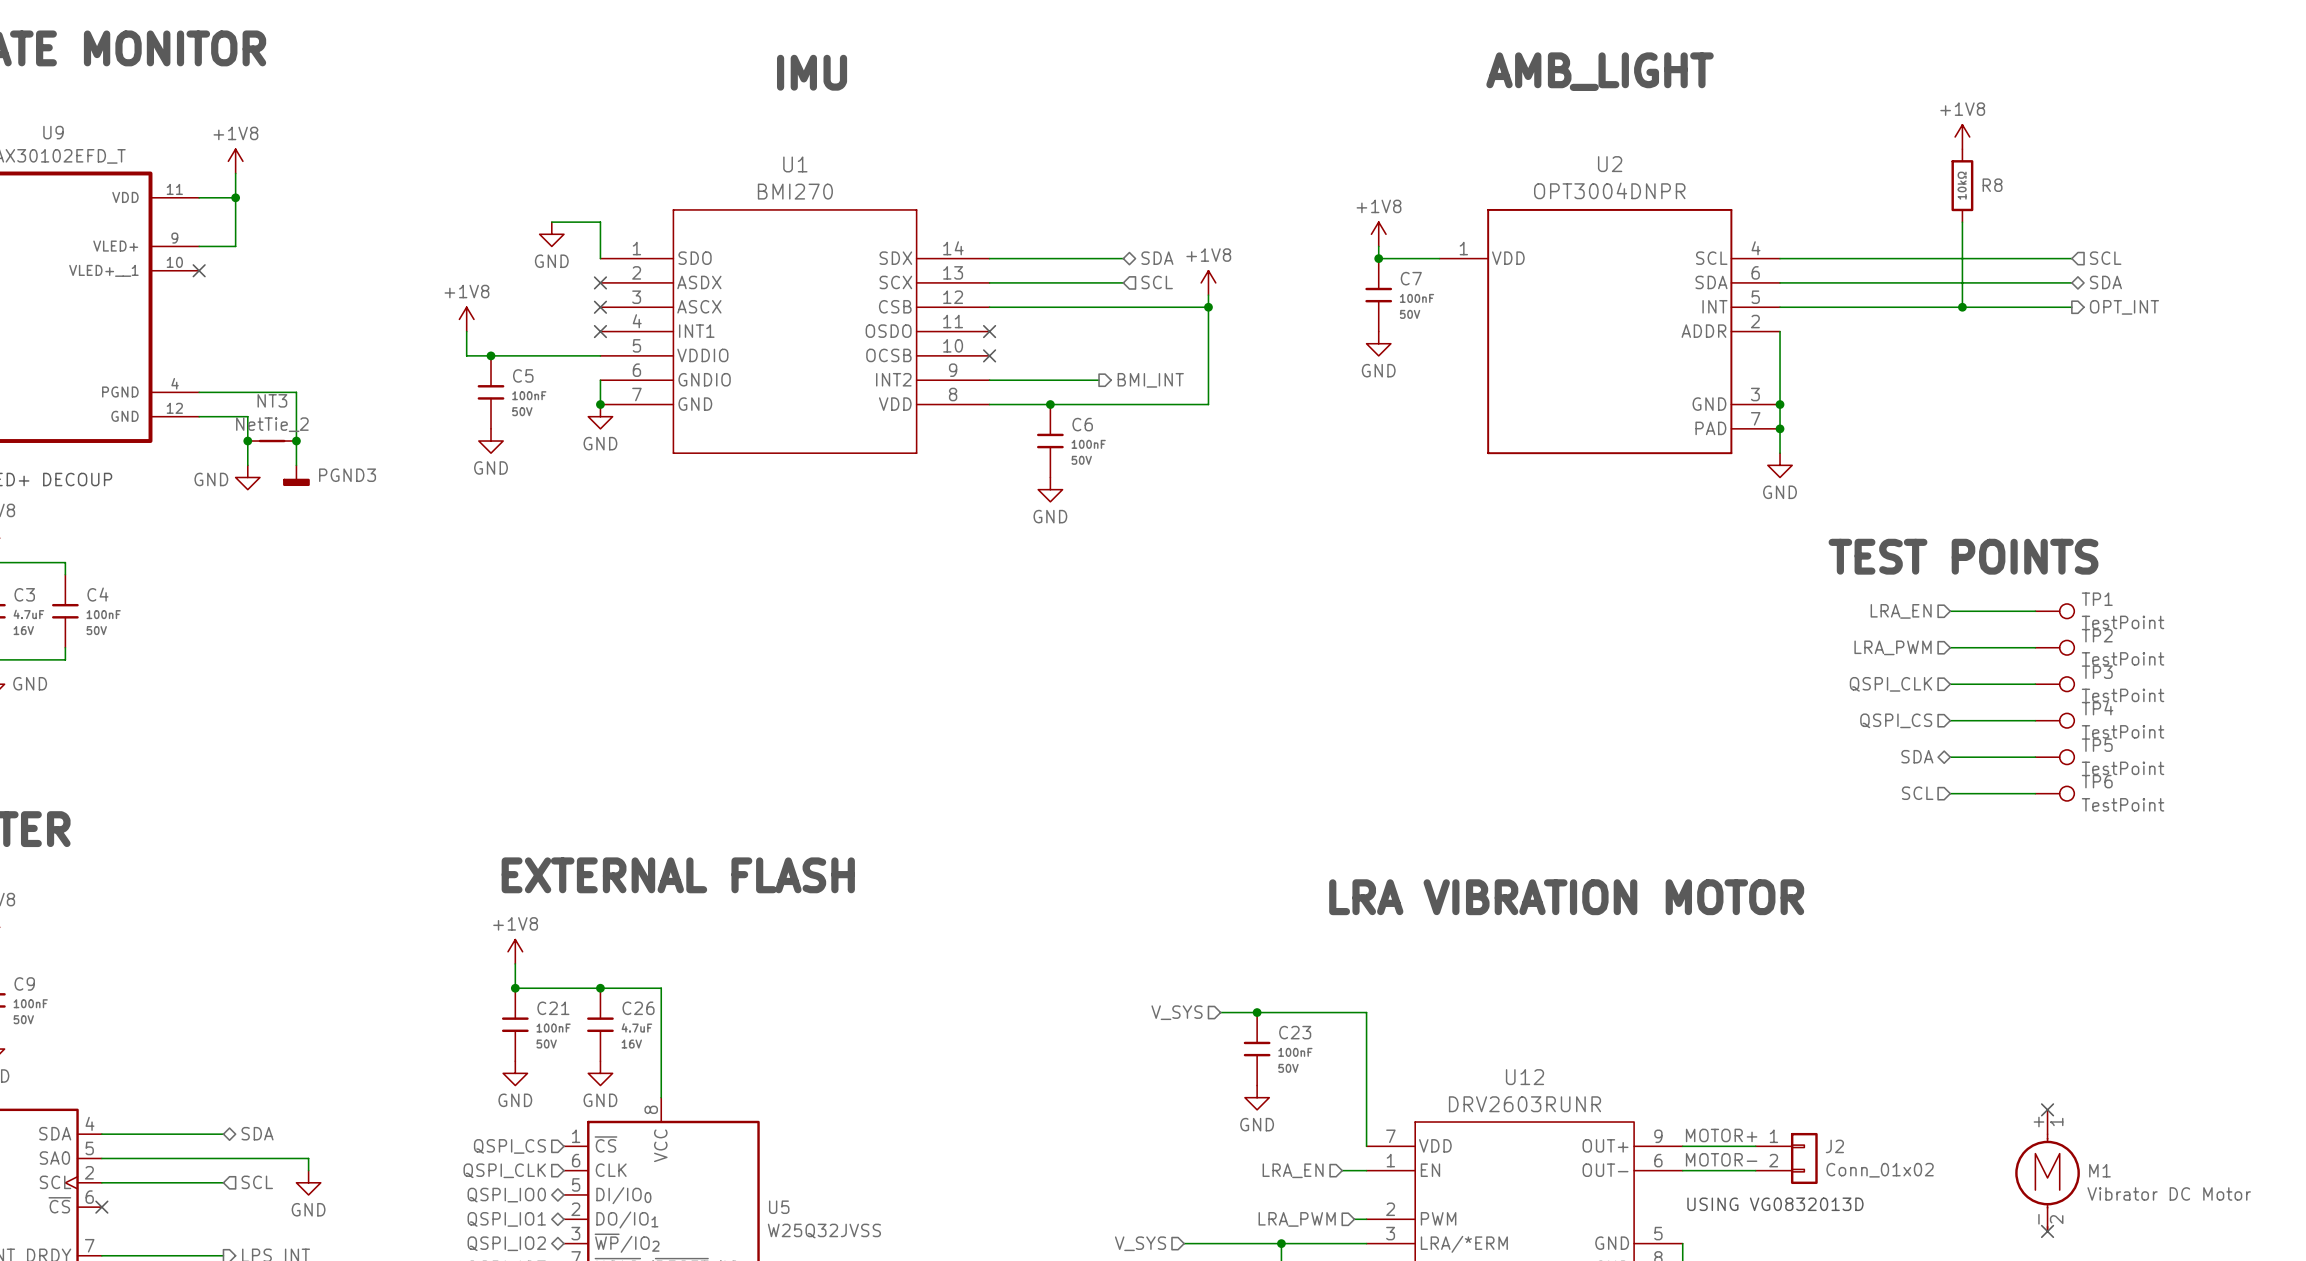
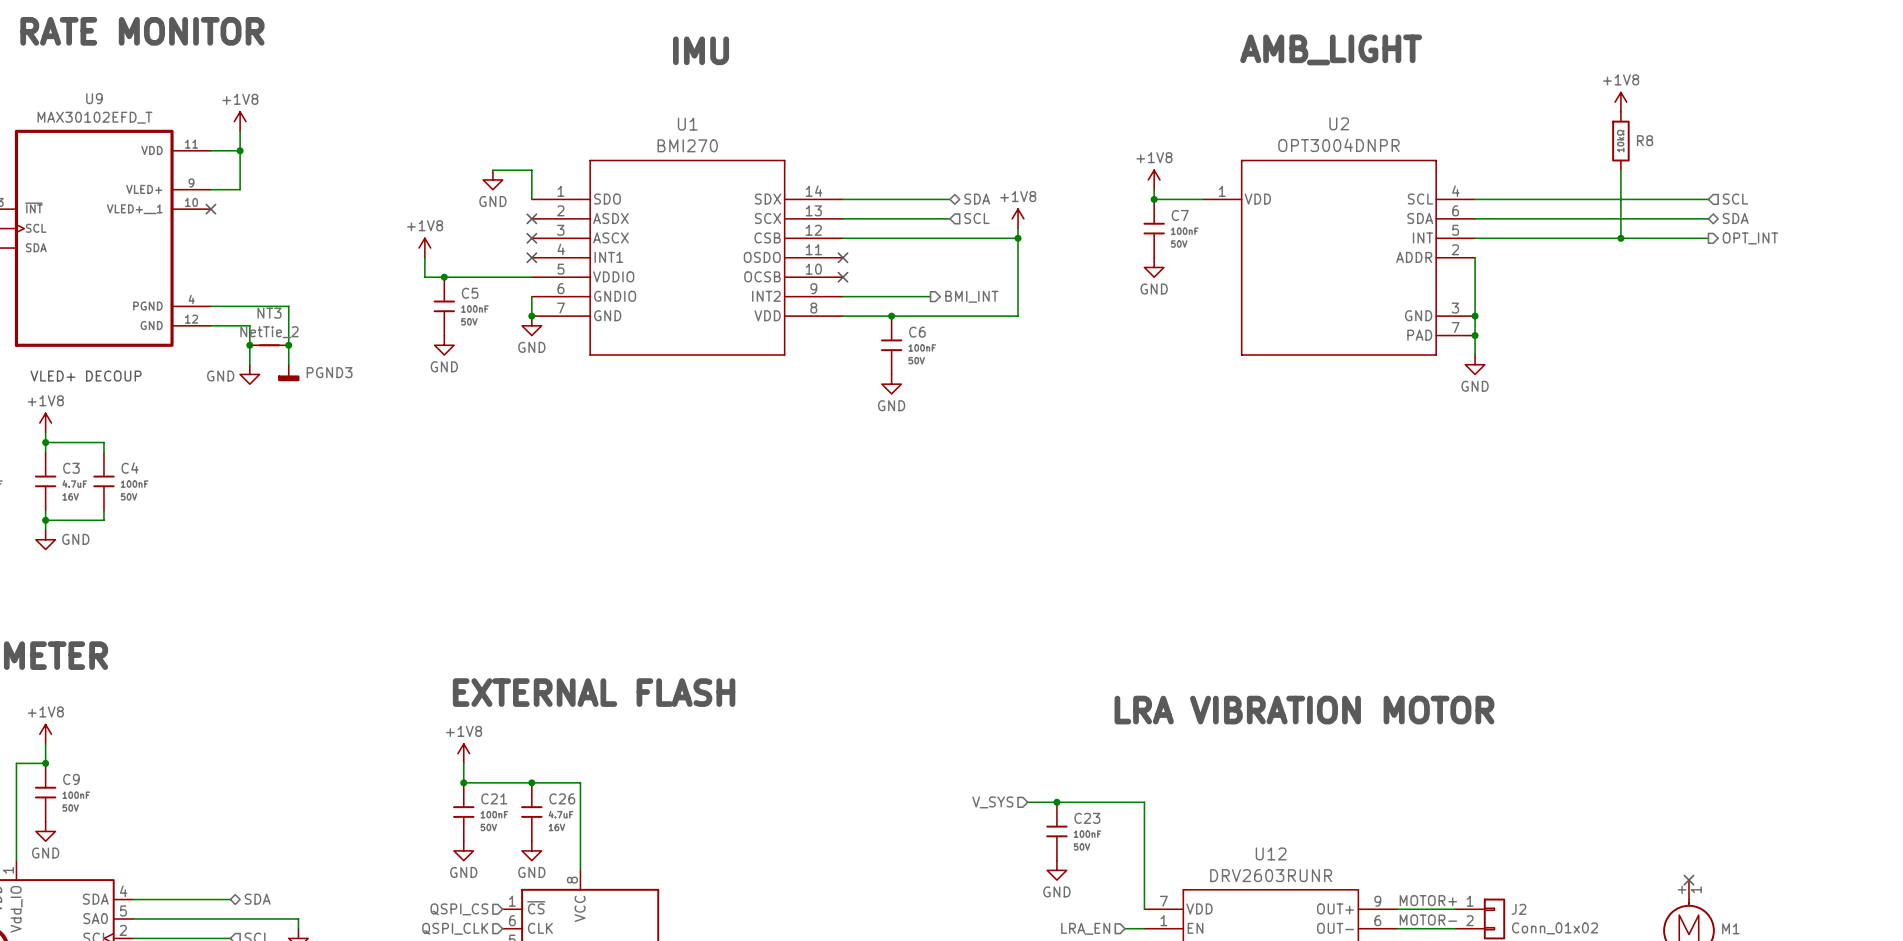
text: TEST POINTS (1963, 556) -> none
hierarchical label: LRA_EN (1901, 611) -> none
wire: (1950, 611) (2035, 611) -> none
TP1: TestPoint (2054, 611) -> none
hierarchical label: LRA_PWM (1893, 647) -> none
wire: (1950, 647) (2035, 647) -> none
TP2: TestPoint (2054, 647) -> none
hierarchical label: QSPI_CLK (1891, 684) -> none
wire: (1950, 684) (2035, 684) -> none
TP3: TestPoint (2054, 684) -> none
hierarchical label: QSPI_CS (1896, 720) -> none
wire: (1950, 720) (2035, 720) -> none
TP4: TestPoint (2054, 720) -> none
hierarchical label: SDA (1917, 756) -> none
wire: (1950, 757) (2035, 757) -> none
TP5: TestPoint (2054, 757) -> none
hierarchical label: SCL (1917, 793) -> none
wire: (1950, 793) (2035, 793) -> none
TP6: TestPoint (2054, 793) -> none

